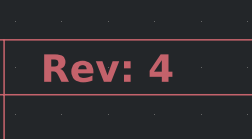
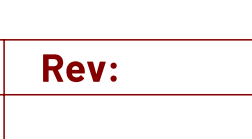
title block: Rev: 4 (108, 68) -> Rev: (79, 68)

